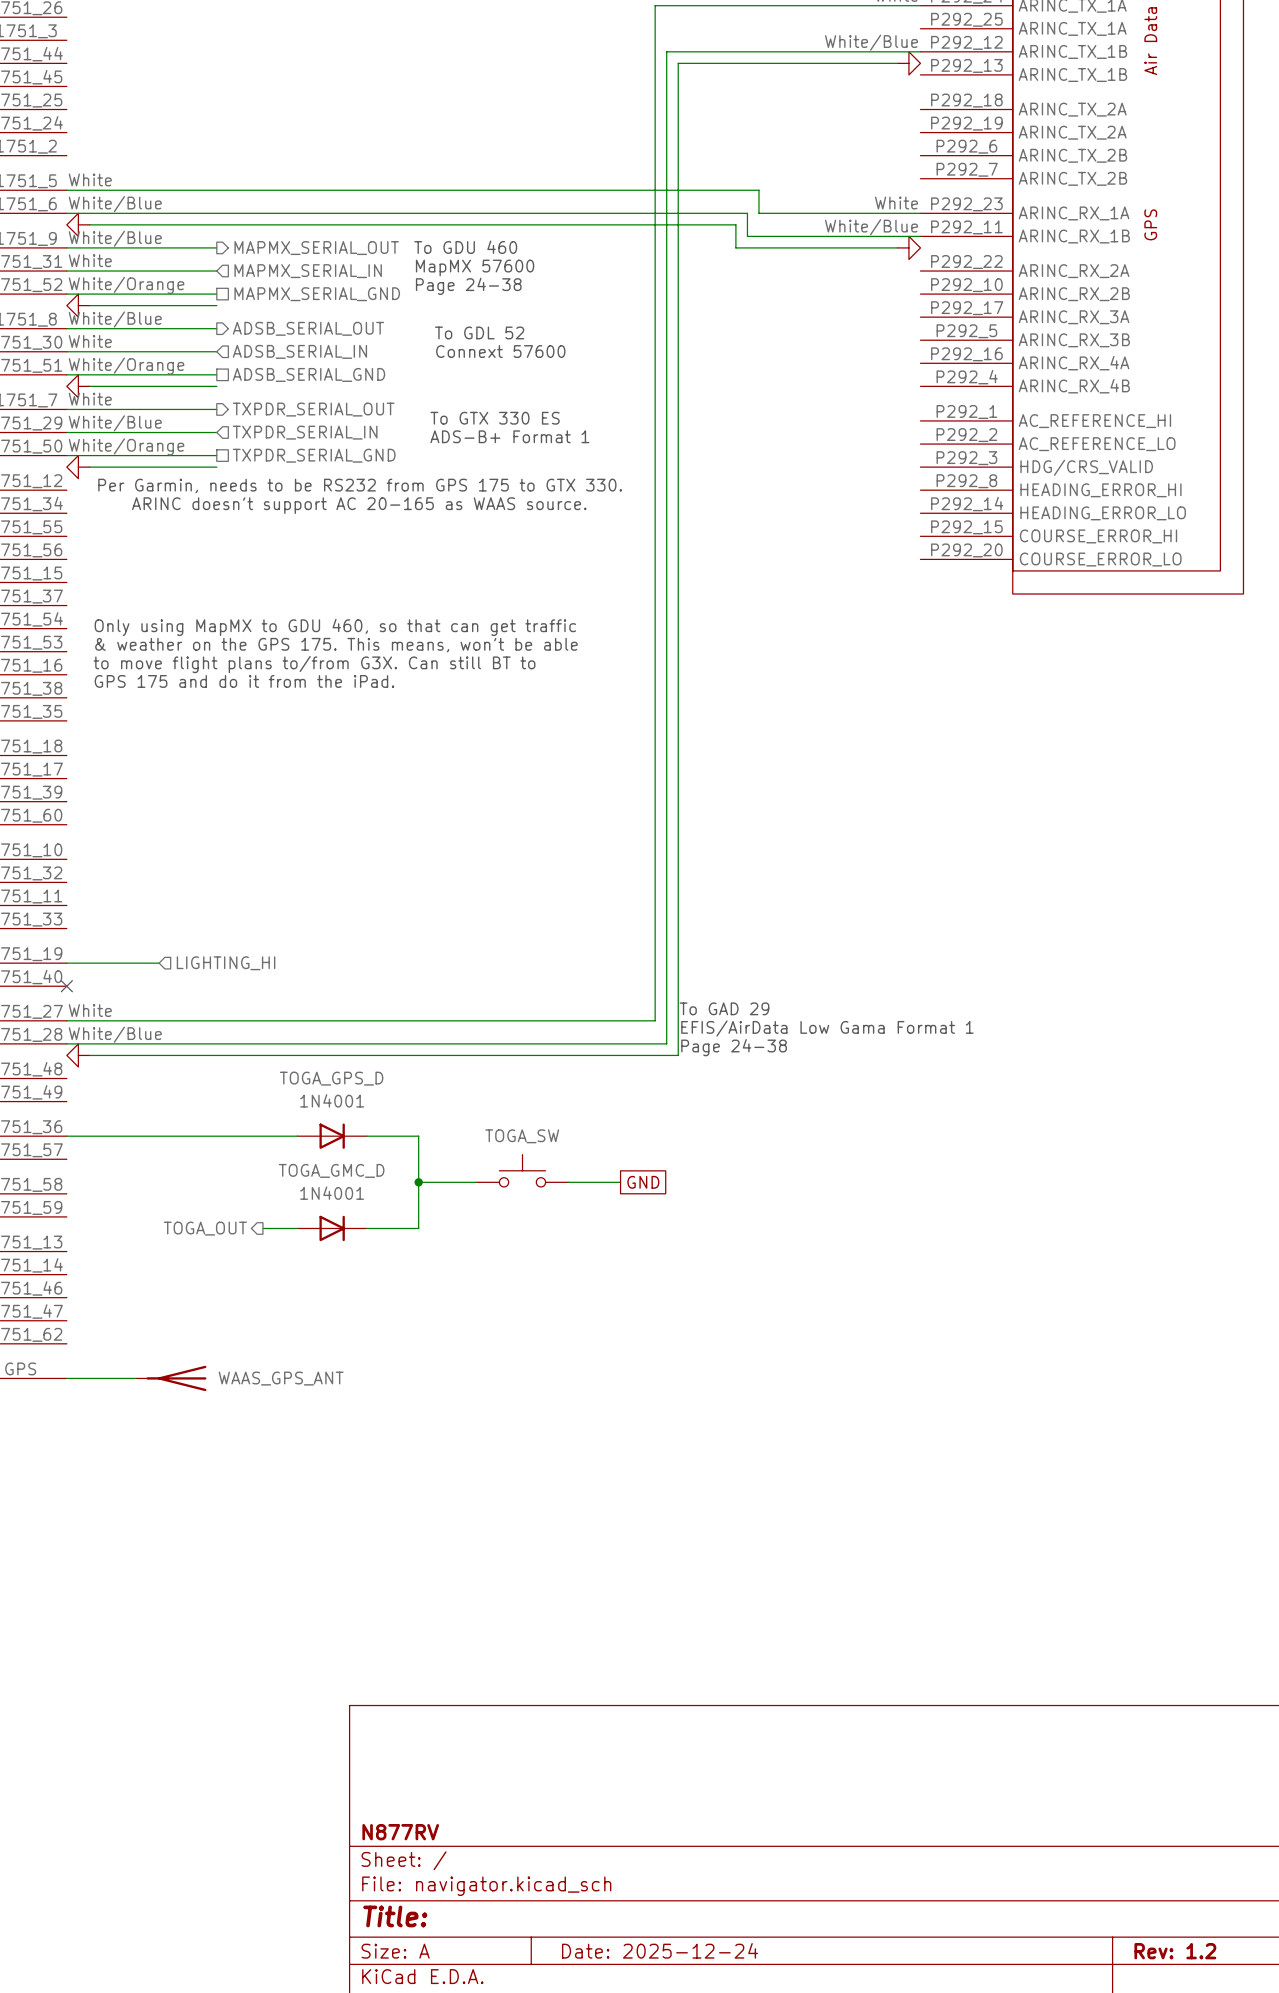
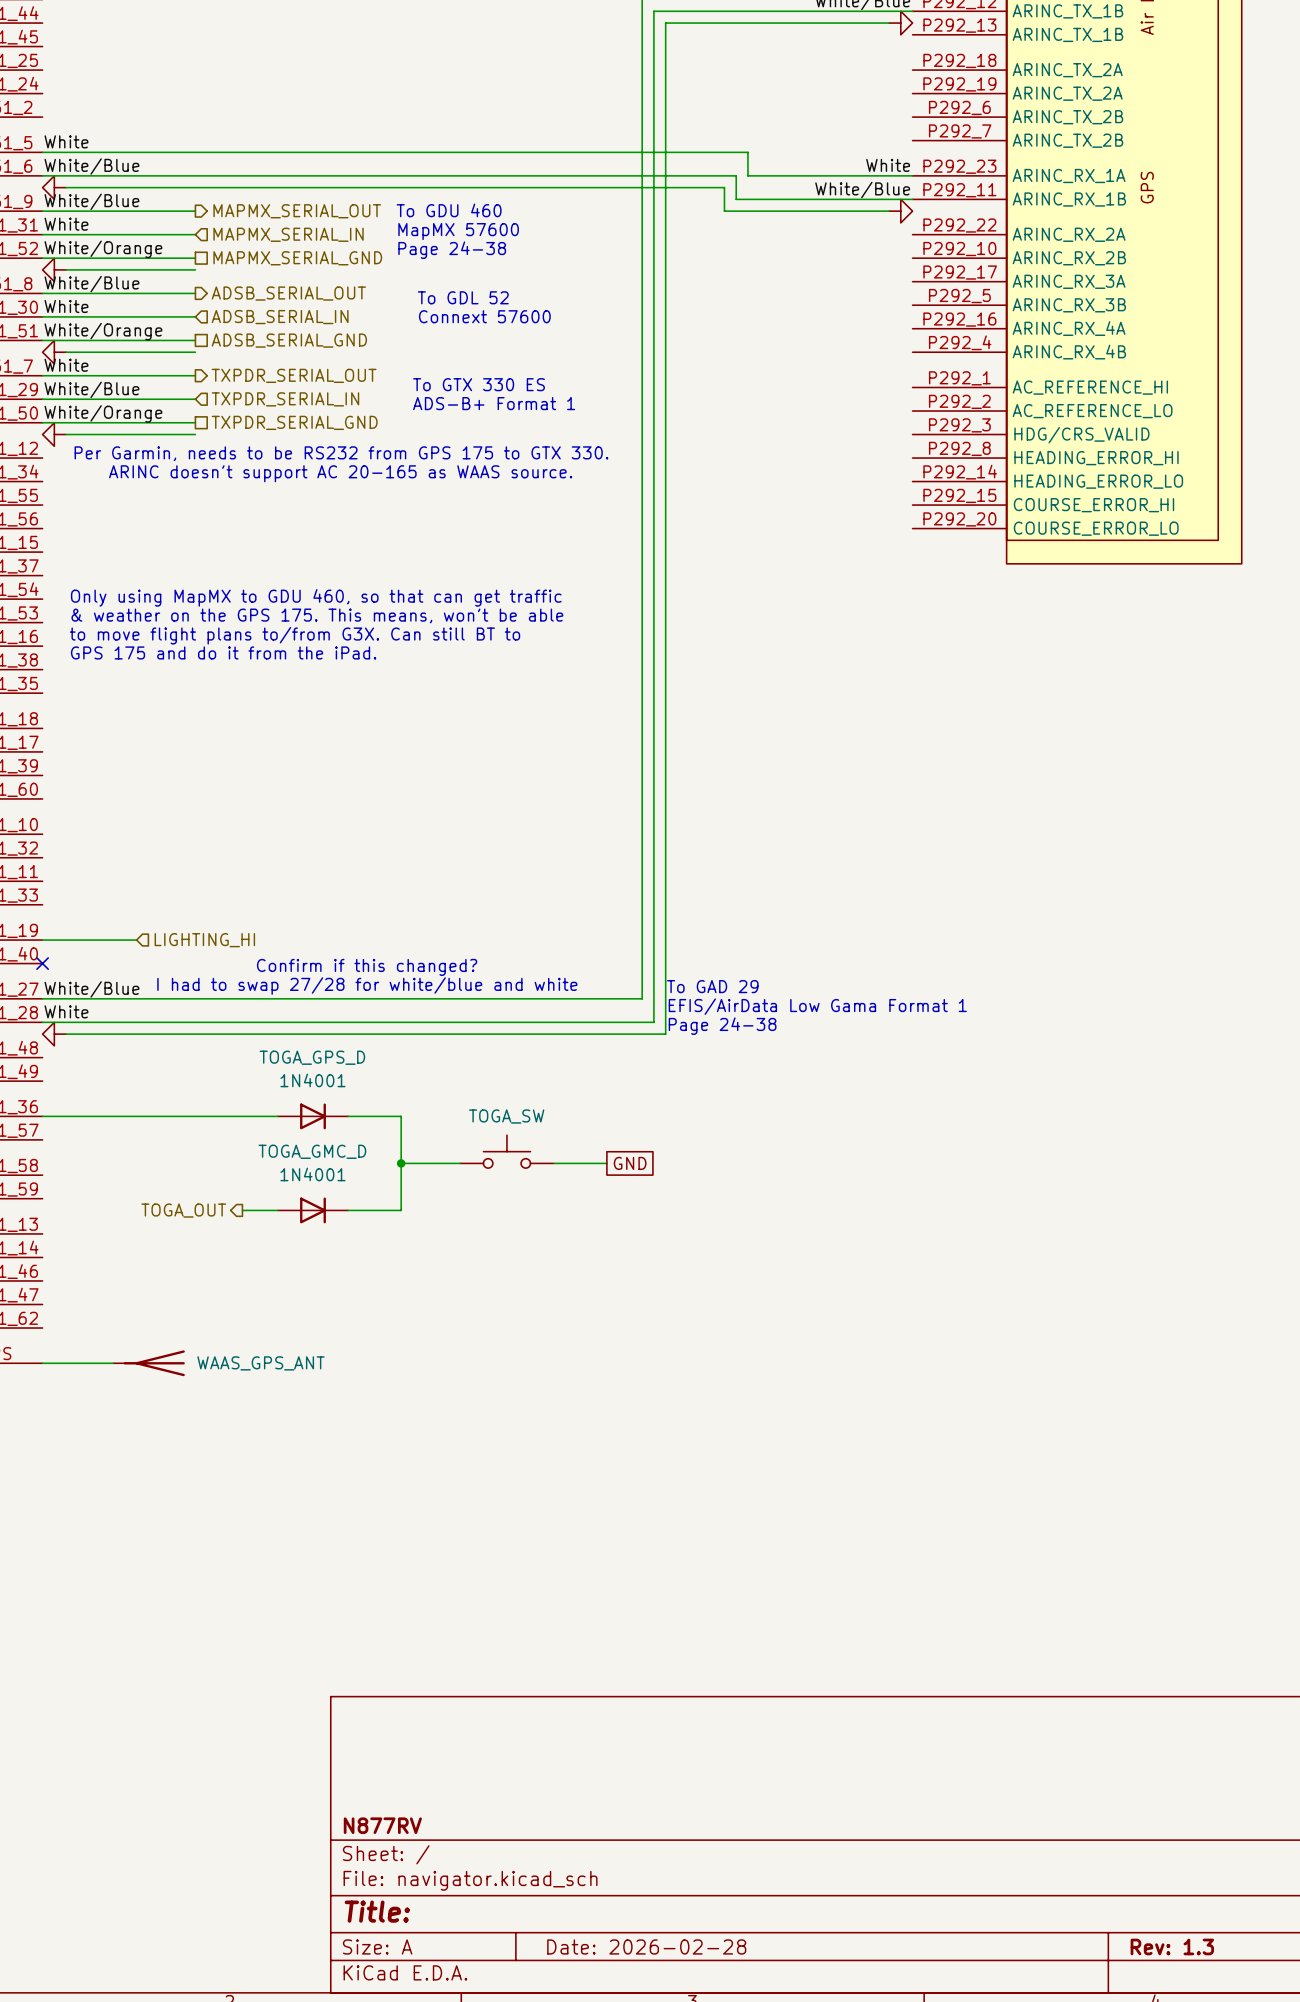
text: none -> Confirm if this changed? (367, 967)
text: none -> I had to swap 27/28 for white/blue and white (367, 986)
label: White (90, 1010) -> White/Blue (91, 989)
label: White/Blue (115, 1034) -> White (66, 1011)
title block: Date: 2025-12-24 (659, 1950) -> Date: 2026-02-28 (646, 1946)
title block: Rev: 1.2 (1175, 1951) -> Rev: 1.3 (1172, 1946)

